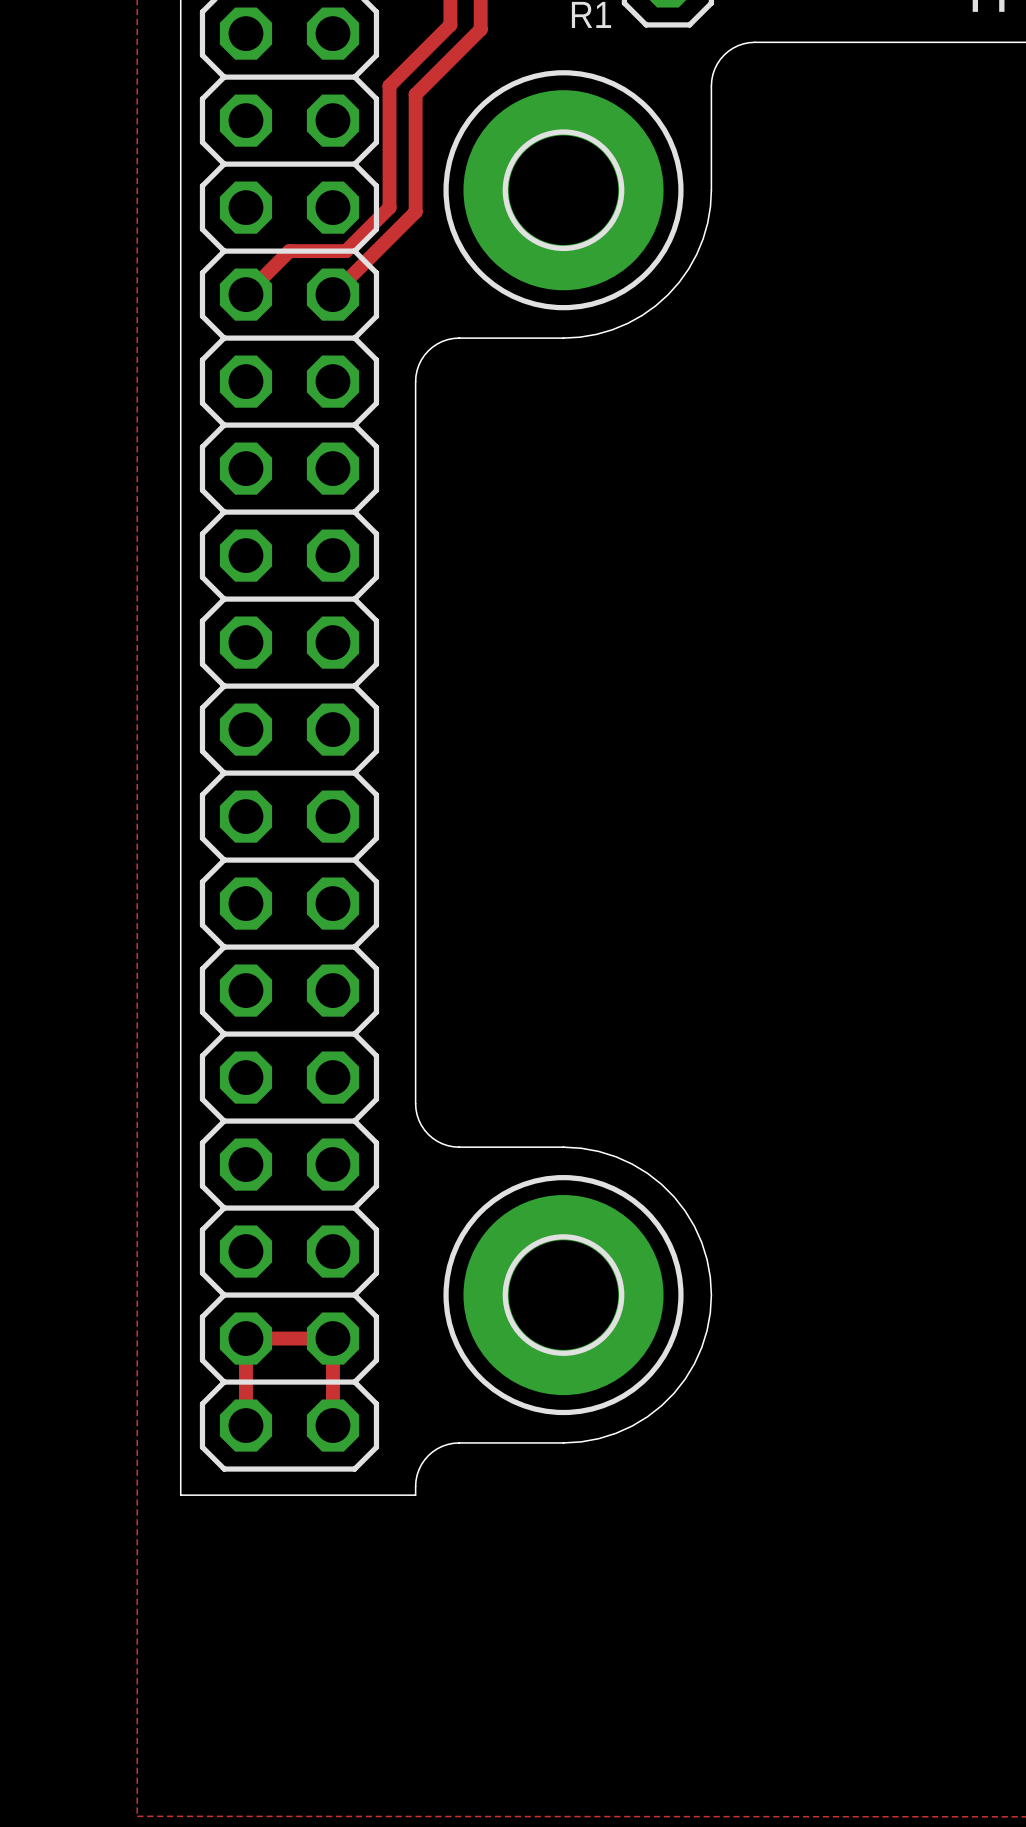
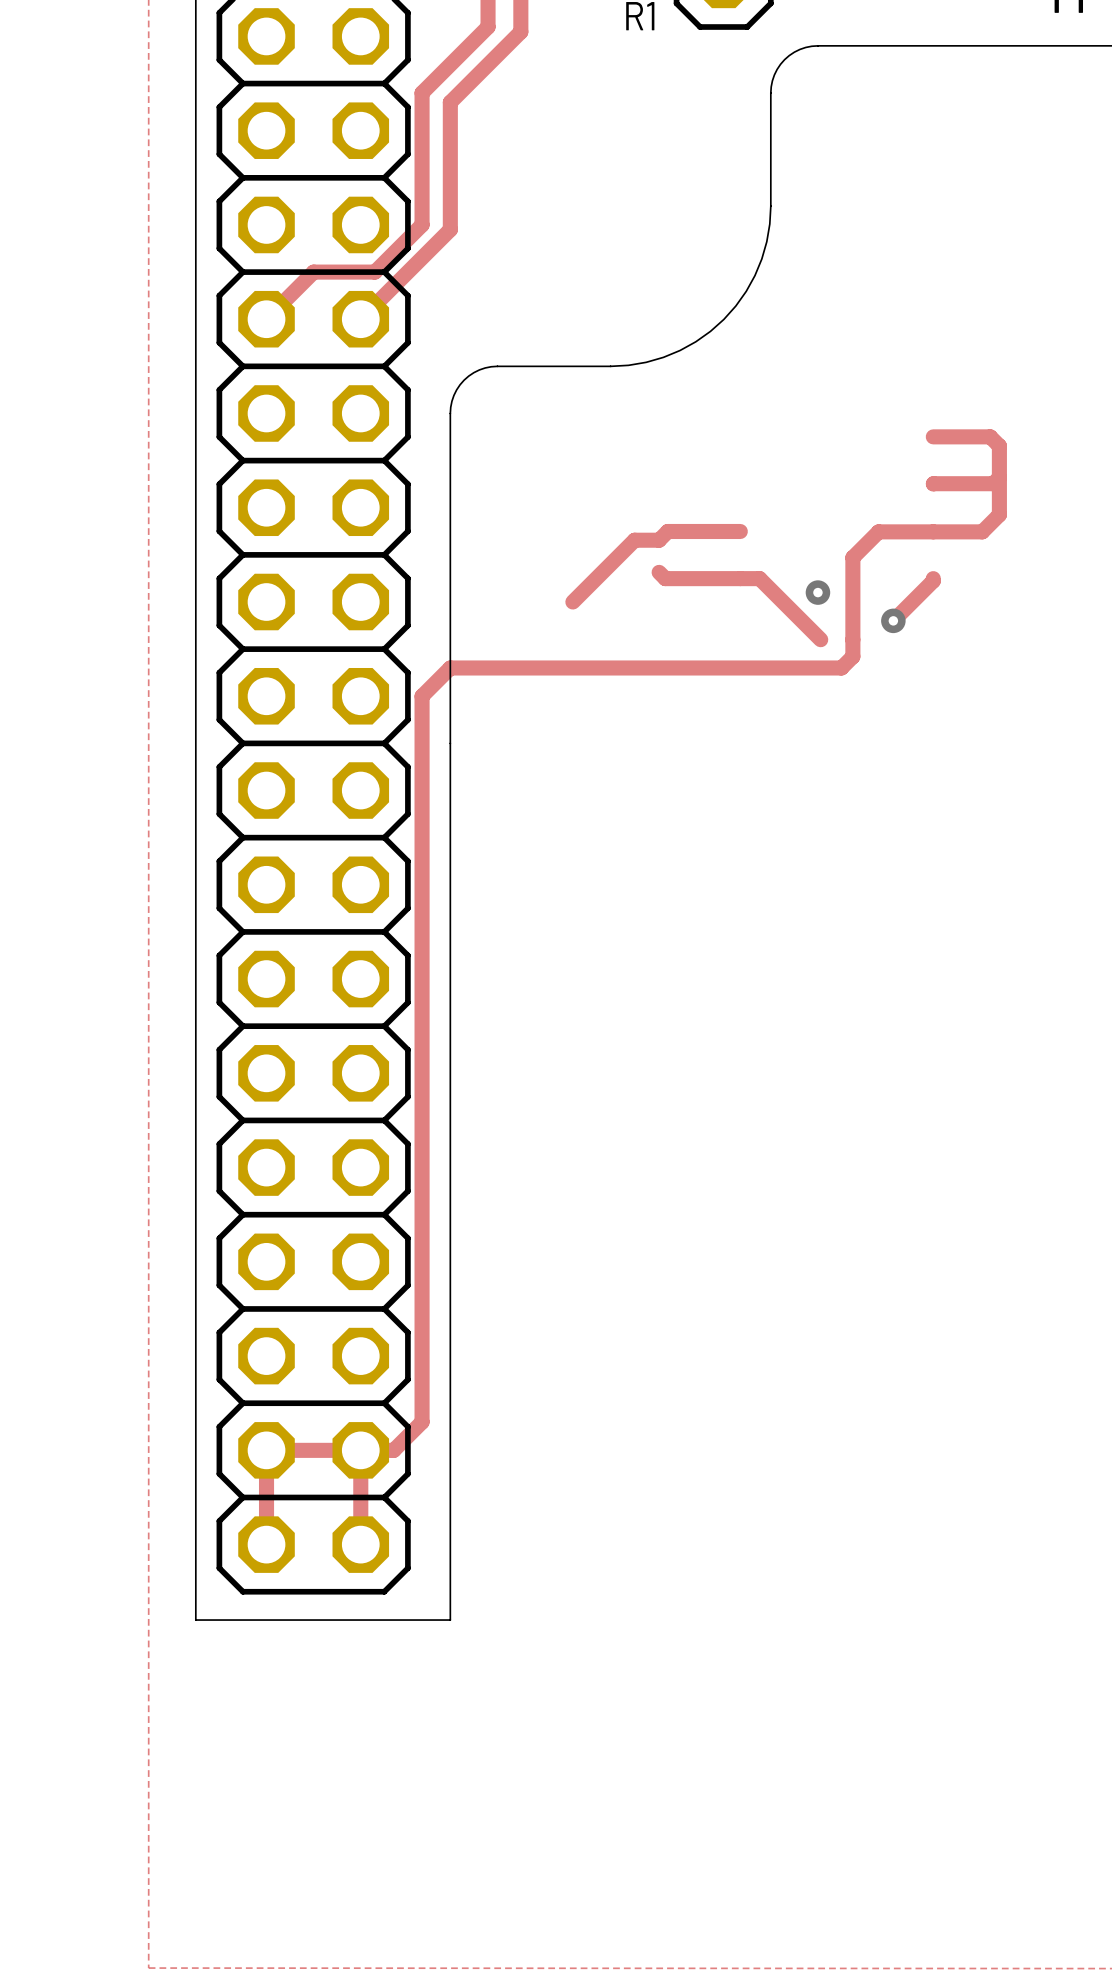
part: (563, 190) -> none
track: none -> (933, 436) (990, 436) (999, 446) (999, 514) (982, 531) (878, 531) (852, 557) (852, 656) (841, 667) (450, 667) (422, 696) (422, 1422) (393, 1450) (360, 1450)
track: none -> (999, 477) (993, 483) (933, 483)
track: none -> (740, 531) (667, 531) (659, 540) (634, 540) (572, 602)
track: none -> (659, 572) (665, 578) (759, 578) (820, 639)
track: none -> (933, 578) (933, 580) (893, 620)
via: none -> (817, 592)
via: none -> (893, 620)
board edge: (415, 1103) (417, 1114) (424, 1130) (437, 1141) (447, 1145) (581, 1148) (615, 1156) (647, 1173) (674, 1196) (694, 1226) (707, 1259) (711, 1295) (707, 1330) (694, 1363) (674, 1393) (647, 1416) (615, 1433) (581, 1441) (447, 1444) (437, 1448) (424, 1459) (417, 1475) (415, 1486) -> (450, 1195) (450, 1610)
part: (563, 1295) -> none

